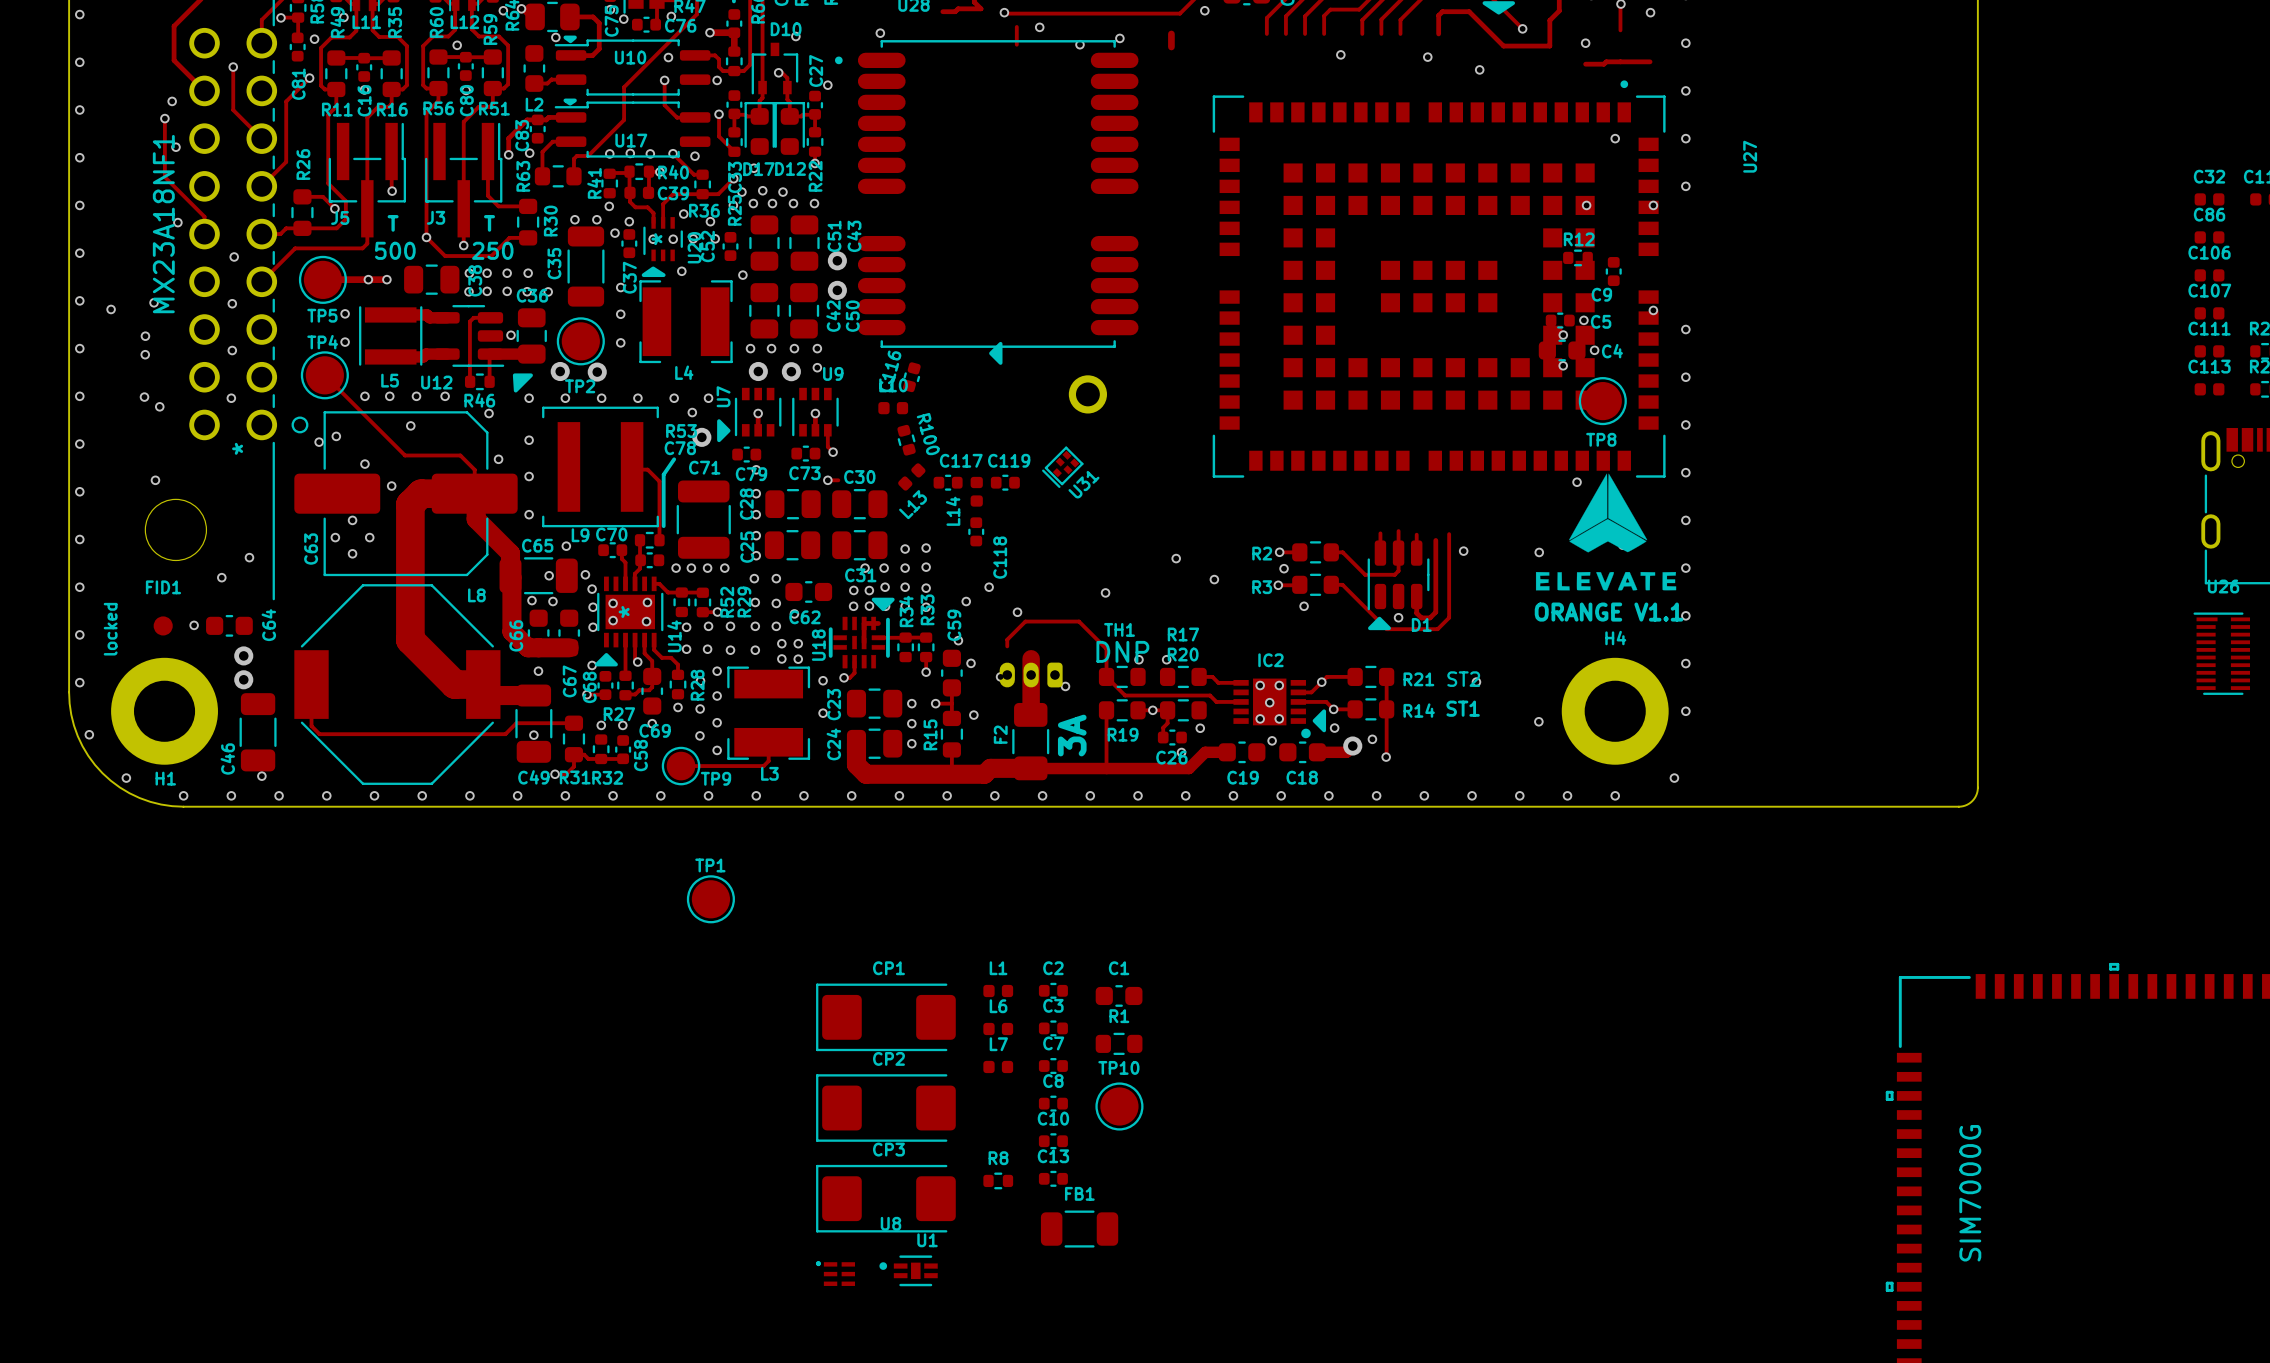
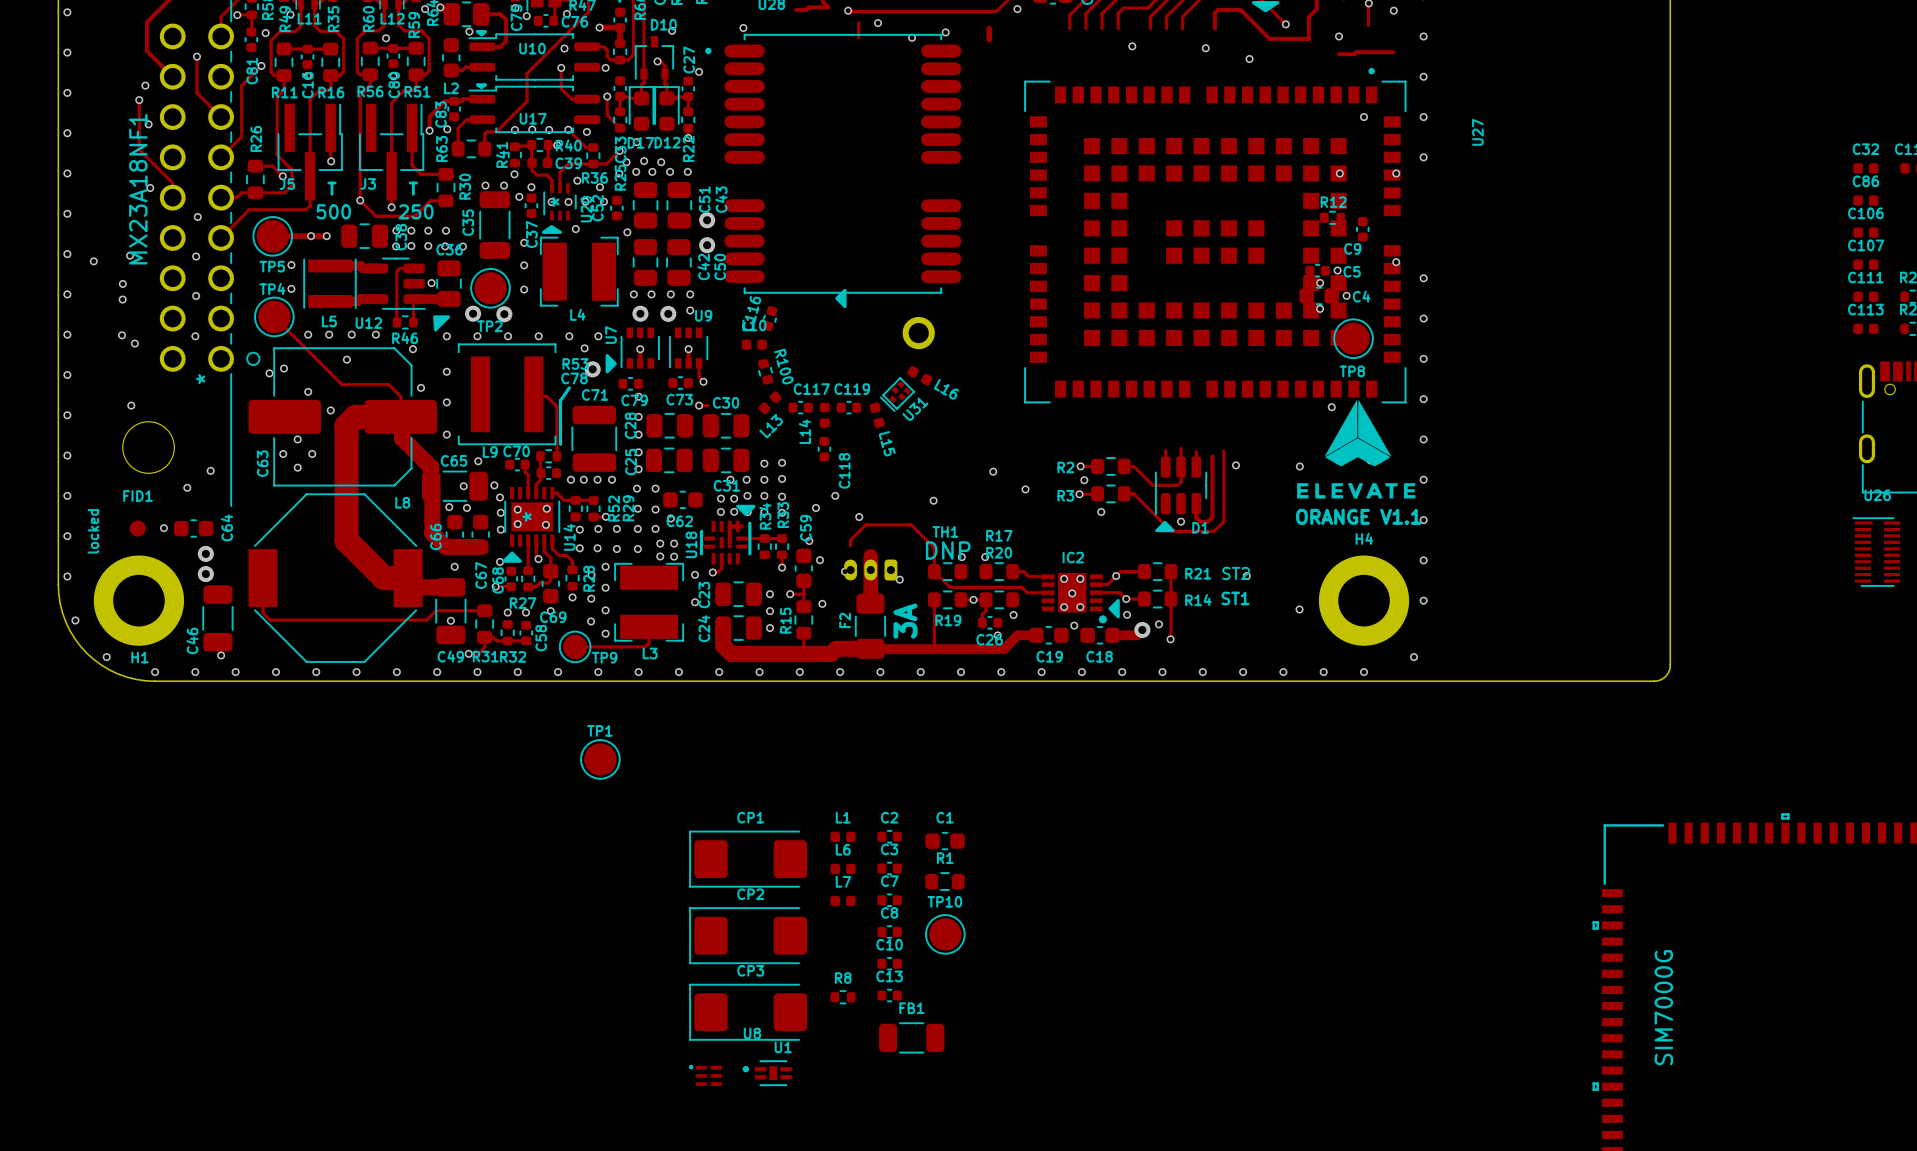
L16: none -> (919, 375)
L15: none -> (877, 415)

